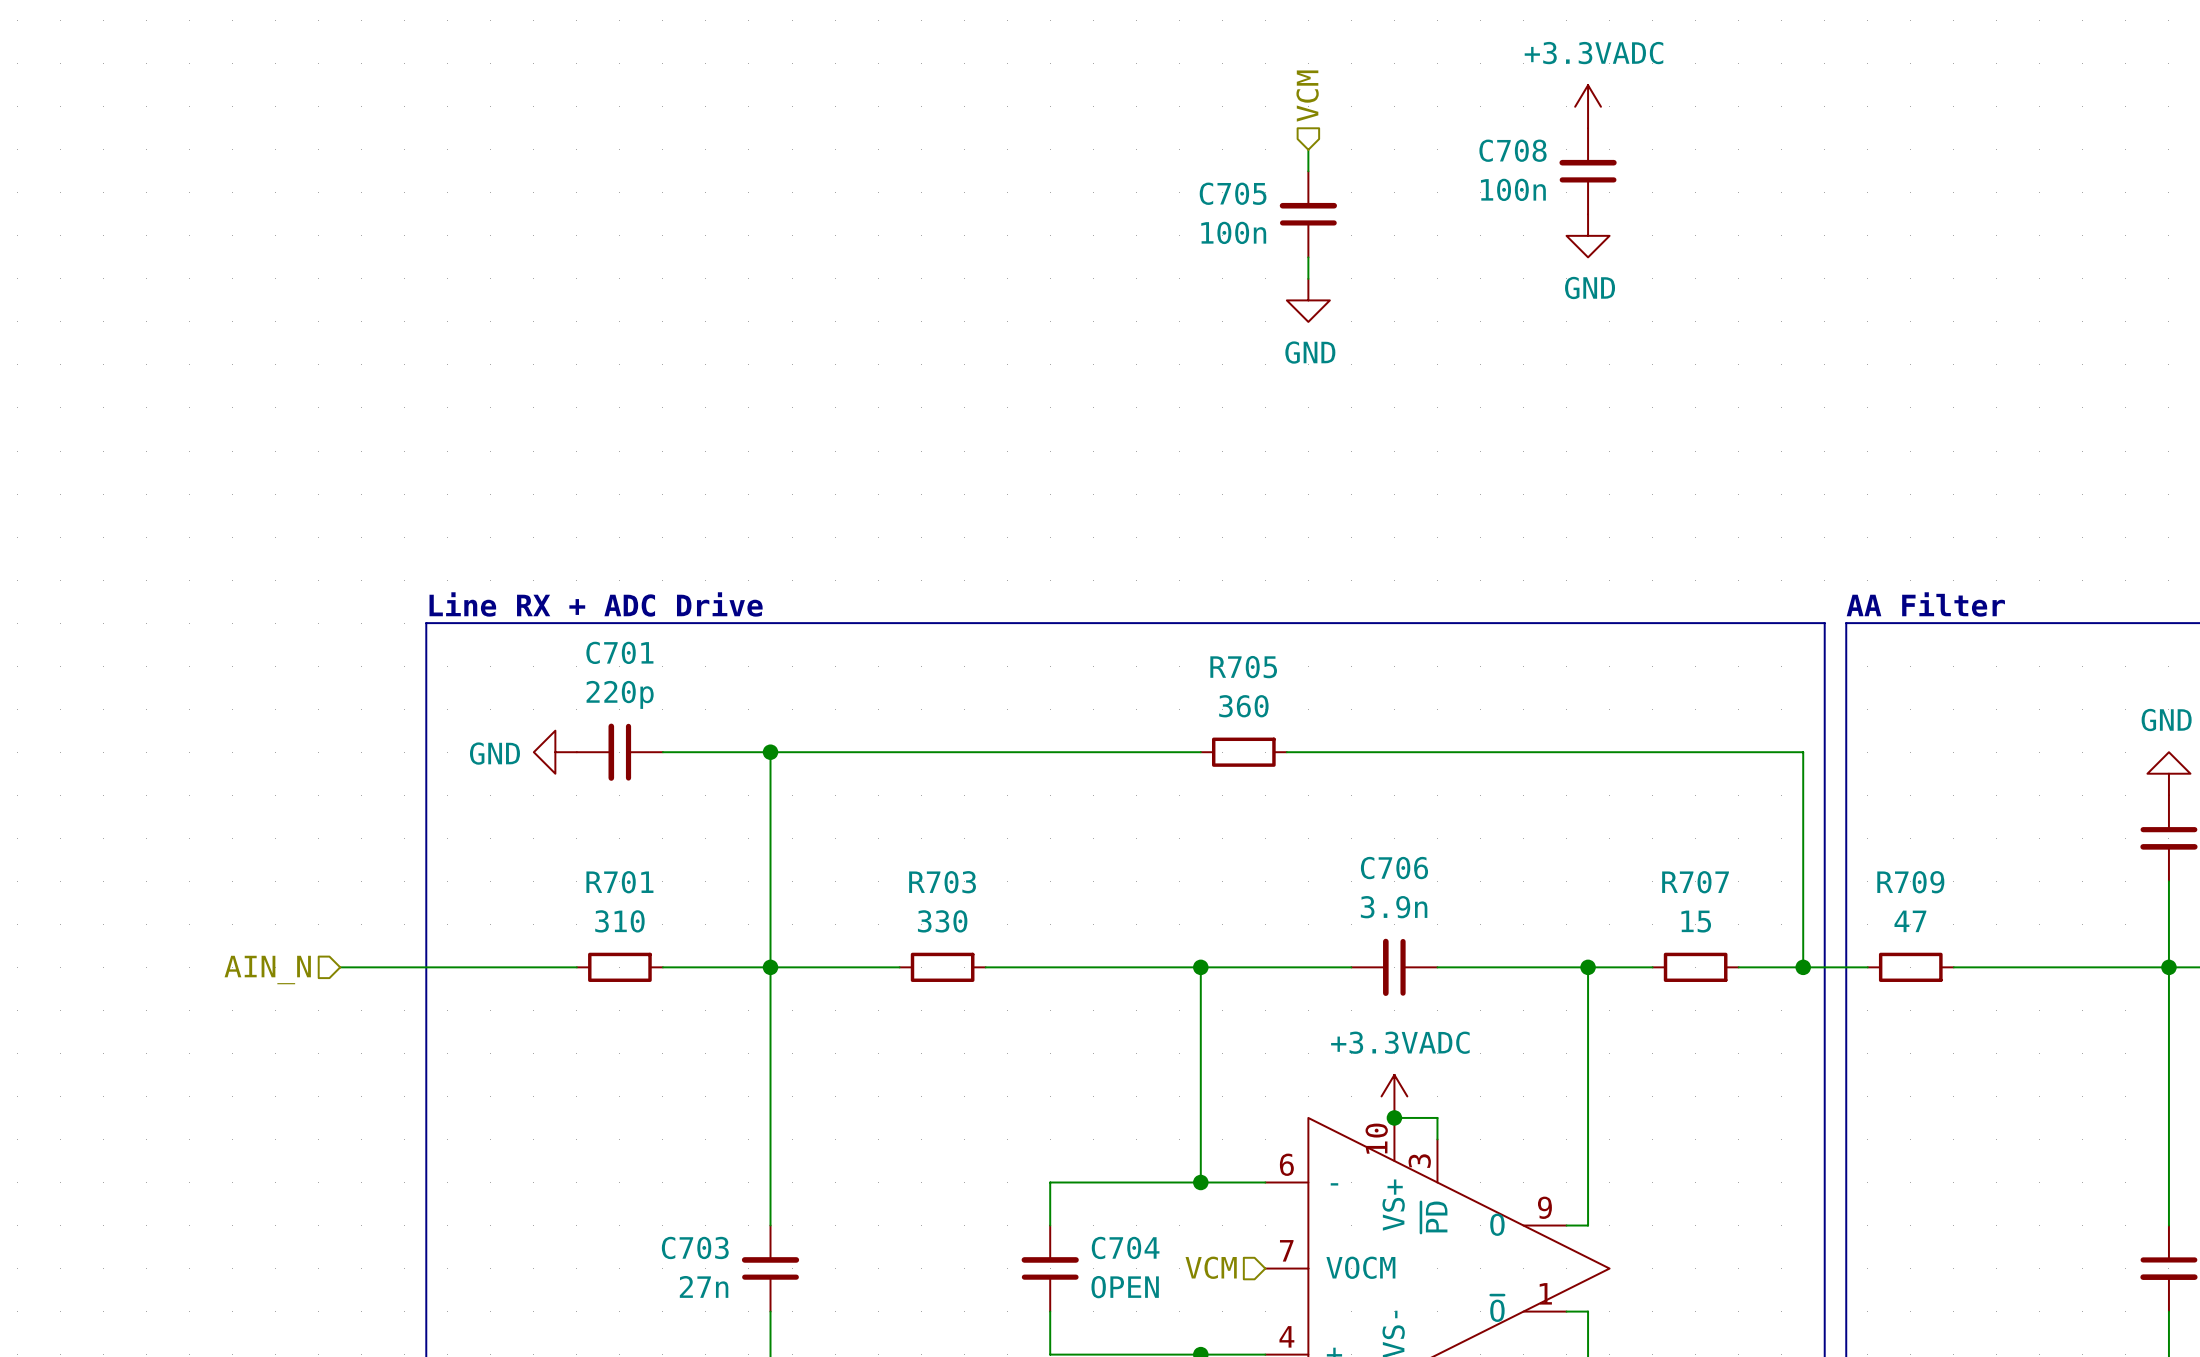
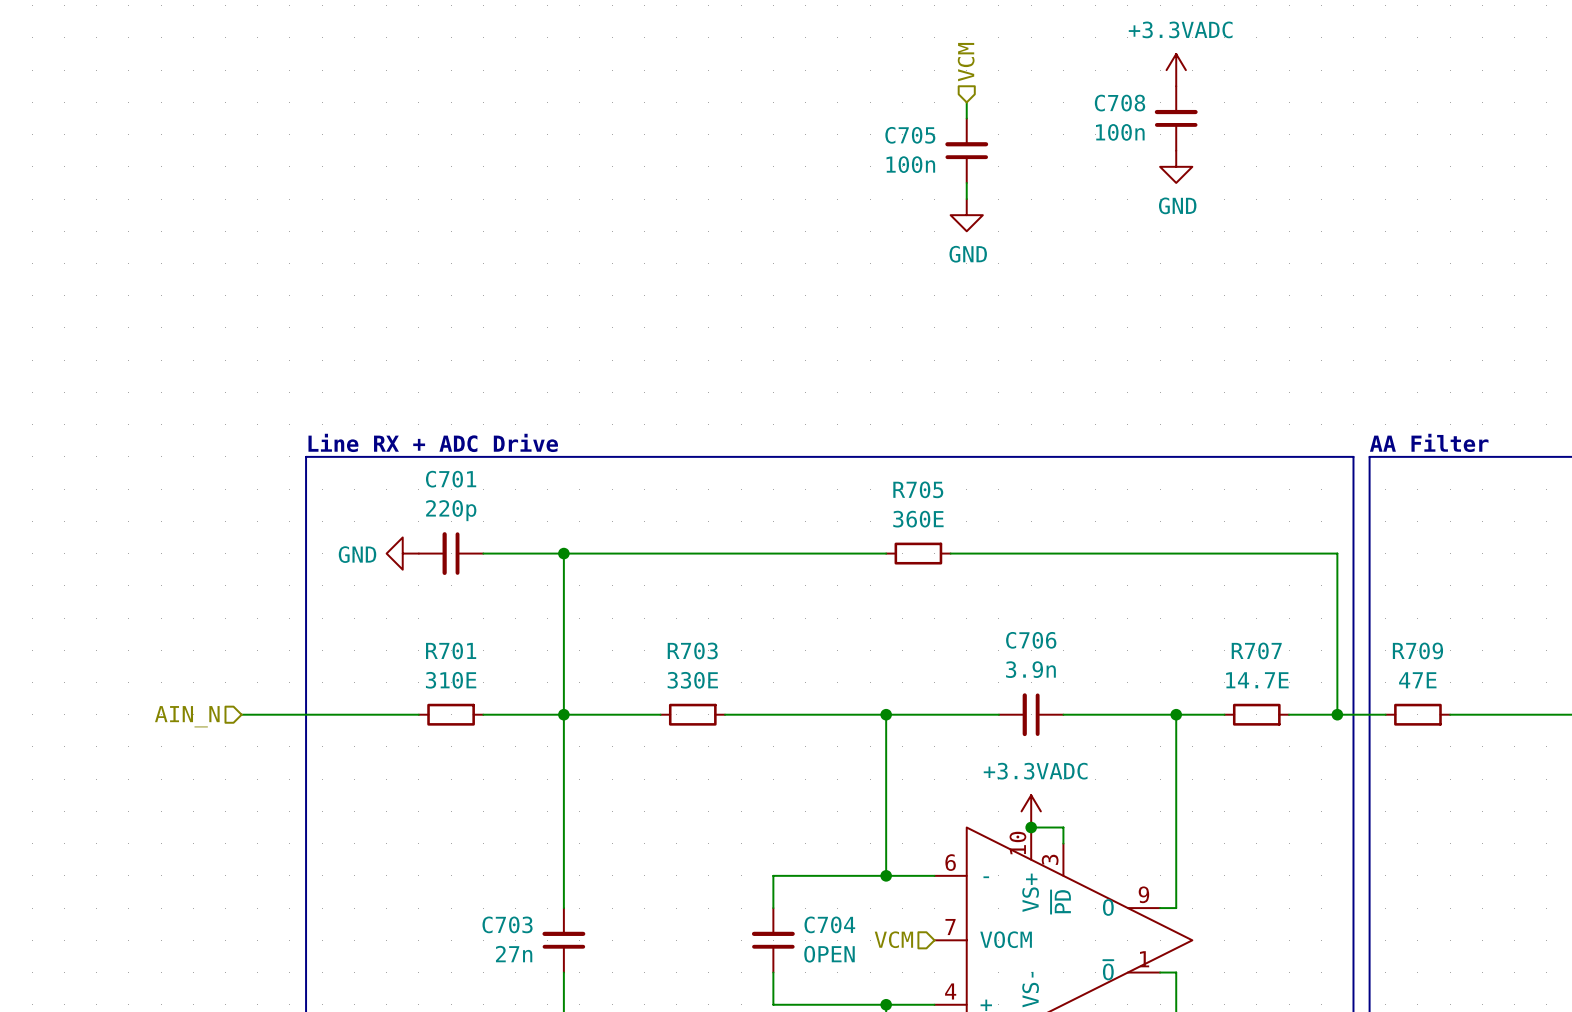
R705 value: 360 (1243, 706) -> 360E (918, 519)
R701 value: 310 (619, 921) -> 310E (451, 680)
R703 value: 330 (942, 921) -> 330E (692, 680)
R707 value: 15 (1696, 921) -> 14.7E (1257, 680)
R709 value: 47 (1910, 921) -> 47E (1417, 680)

